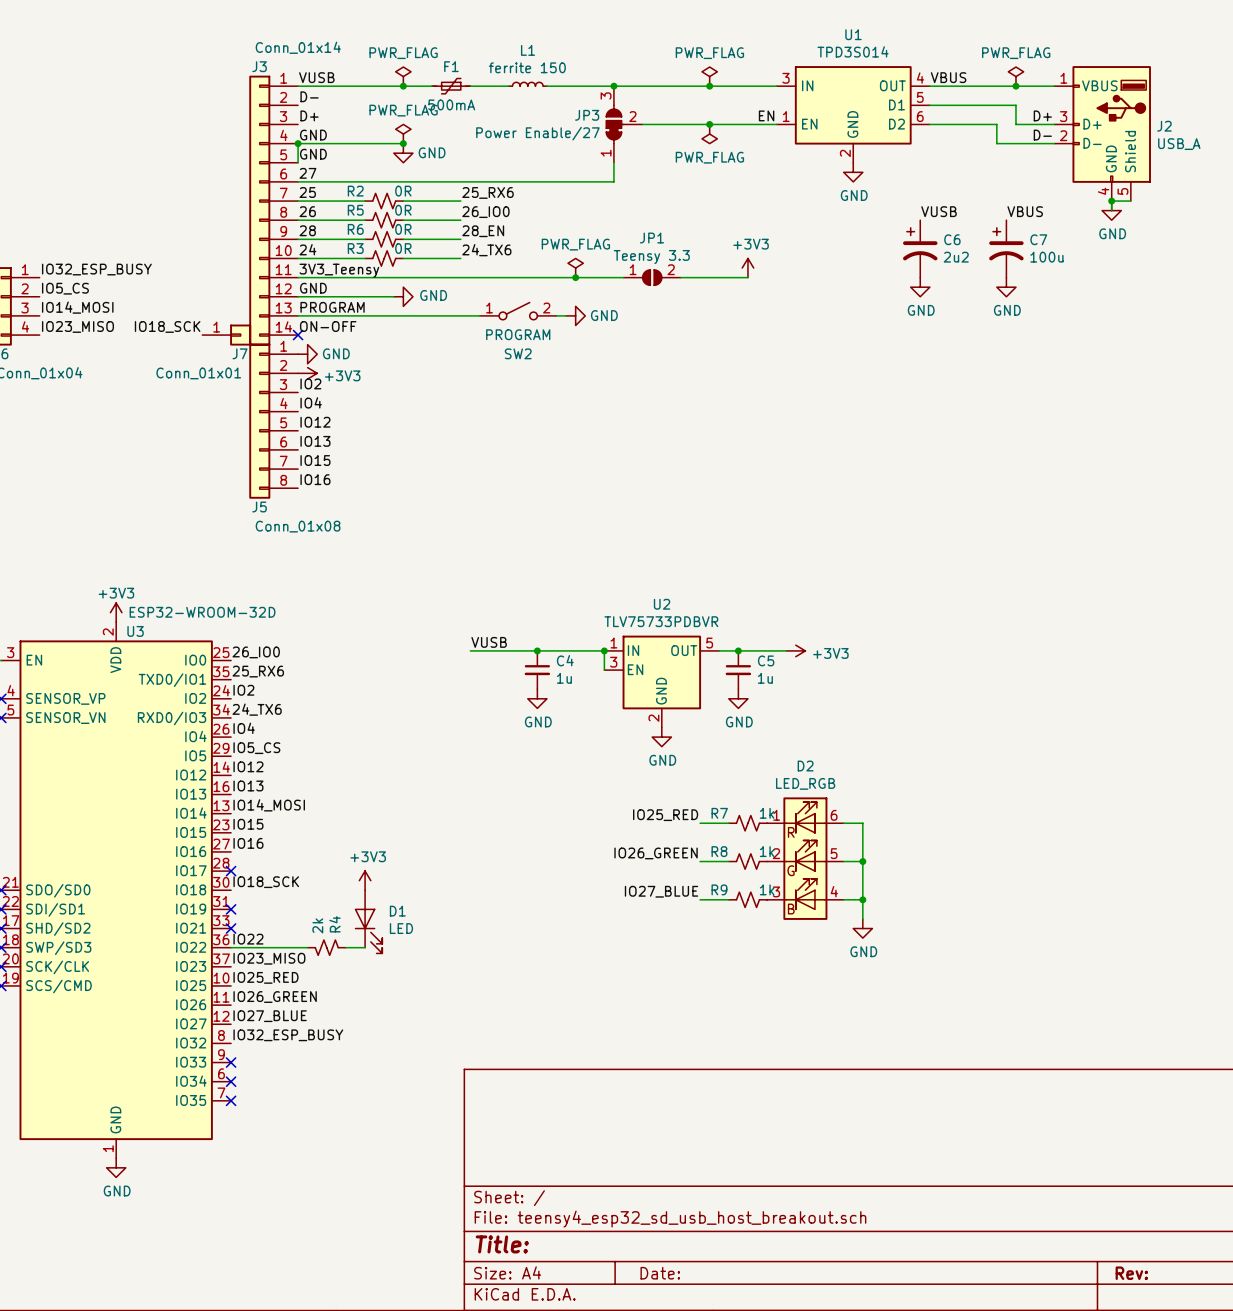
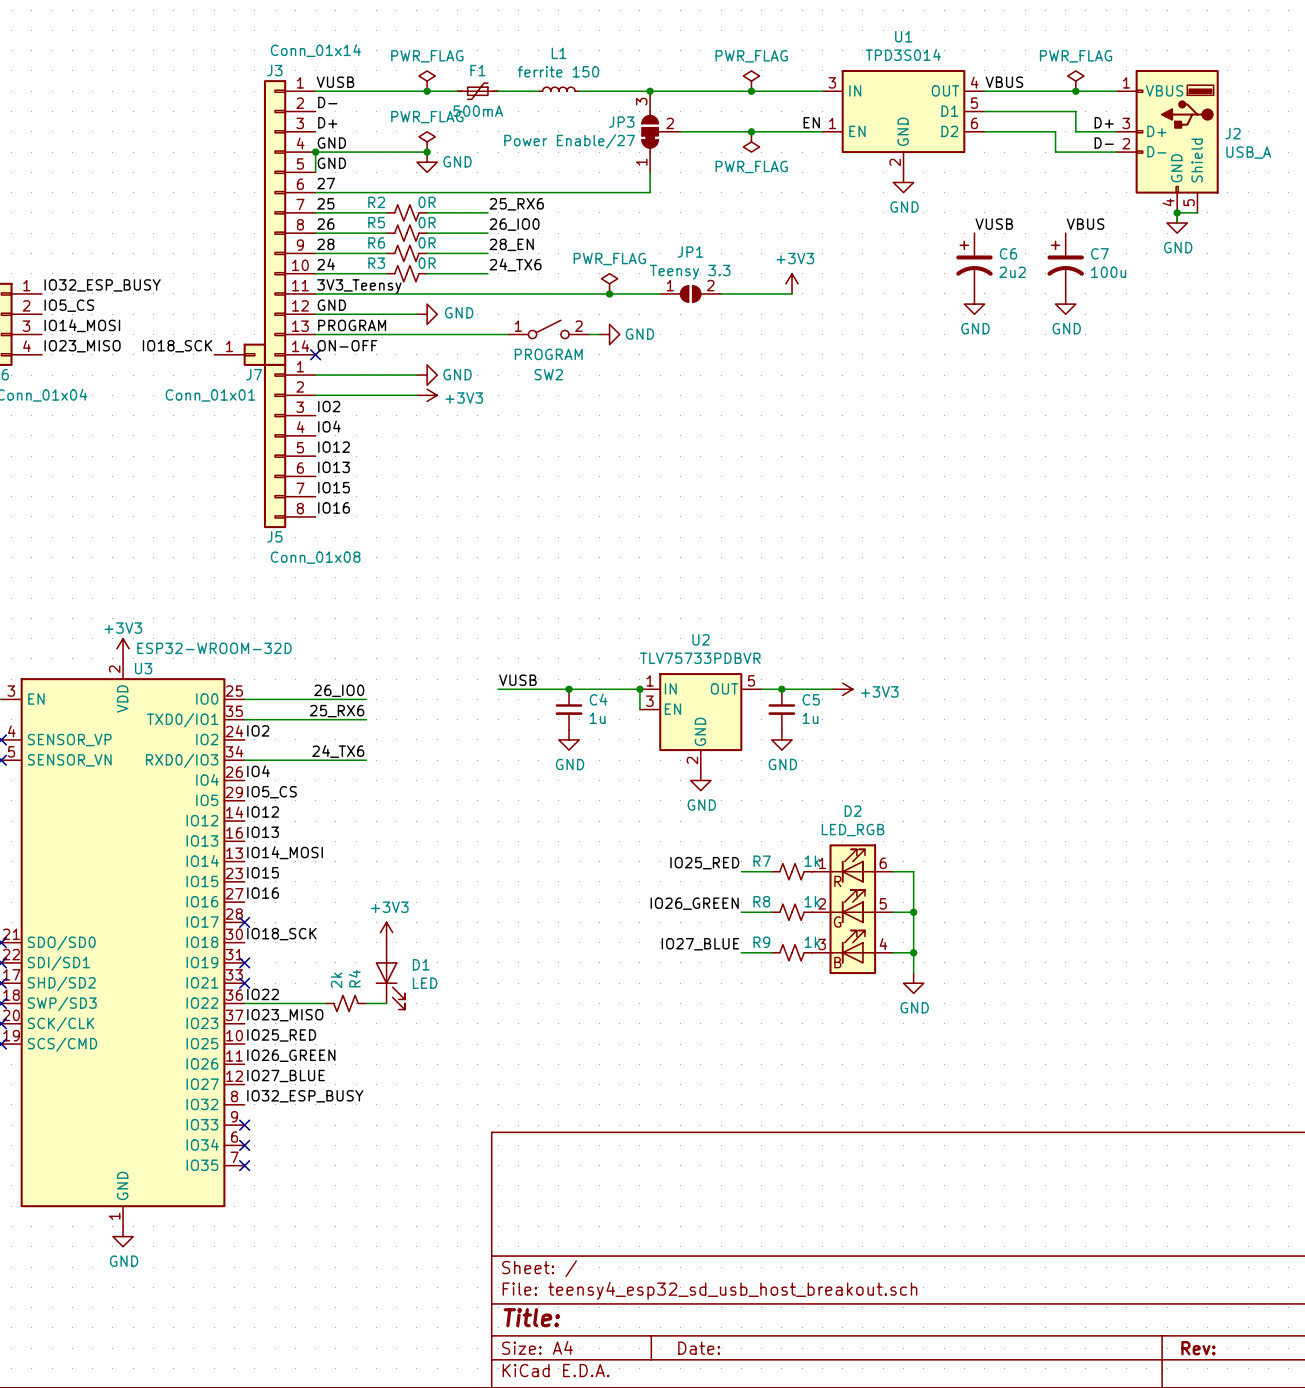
wire: none -> (315, 375) (416, 375)
power symbol position: GND (307, 354) -> GND (427, 375)
wire: none -> (315, 395) (416, 395)
power symbol position: +3V3 (307, 373) -> +3V3 (427, 395)
label position: 26_IO0 (256, 652) -> 26_IO0 (339, 690)
wire: none -> (244, 699) (366, 699)
label position: 25_RX6 (258, 671) -> 25_RX6 (337, 711)
wire: none -> (244, 719) (366, 719)
label position: 24_TX6 (257, 709) -> 24_TX6 (338, 751)
wire: none -> (244, 760) (366, 760)

